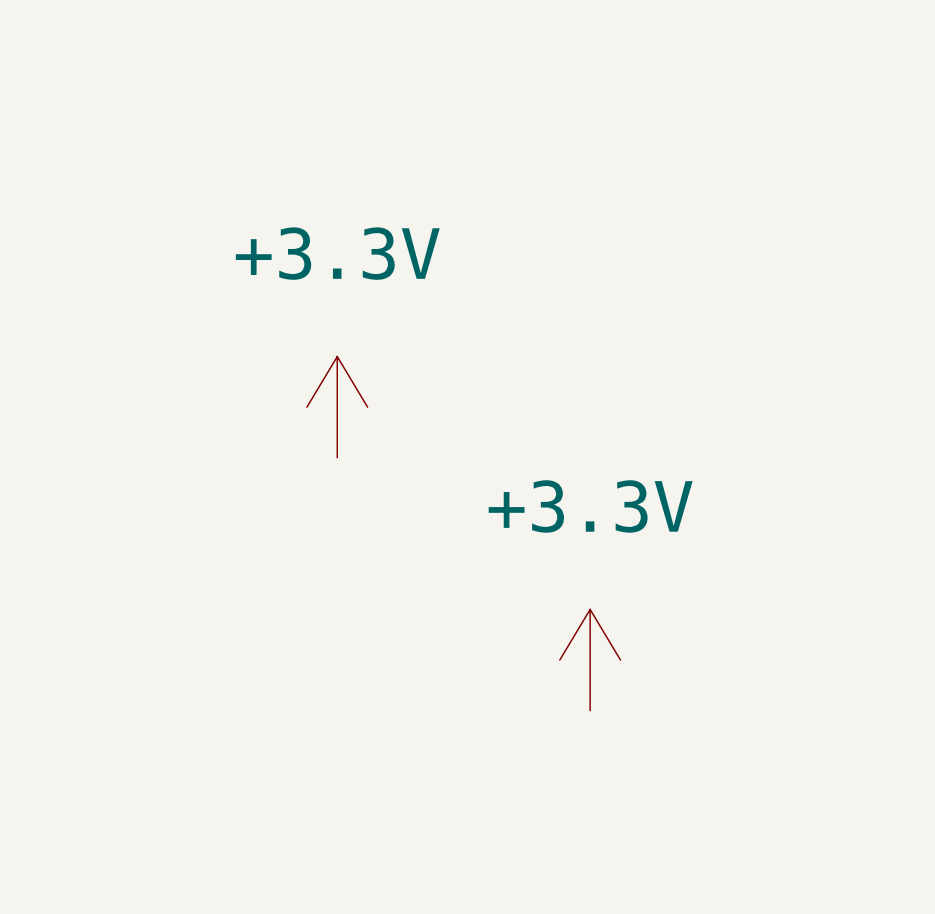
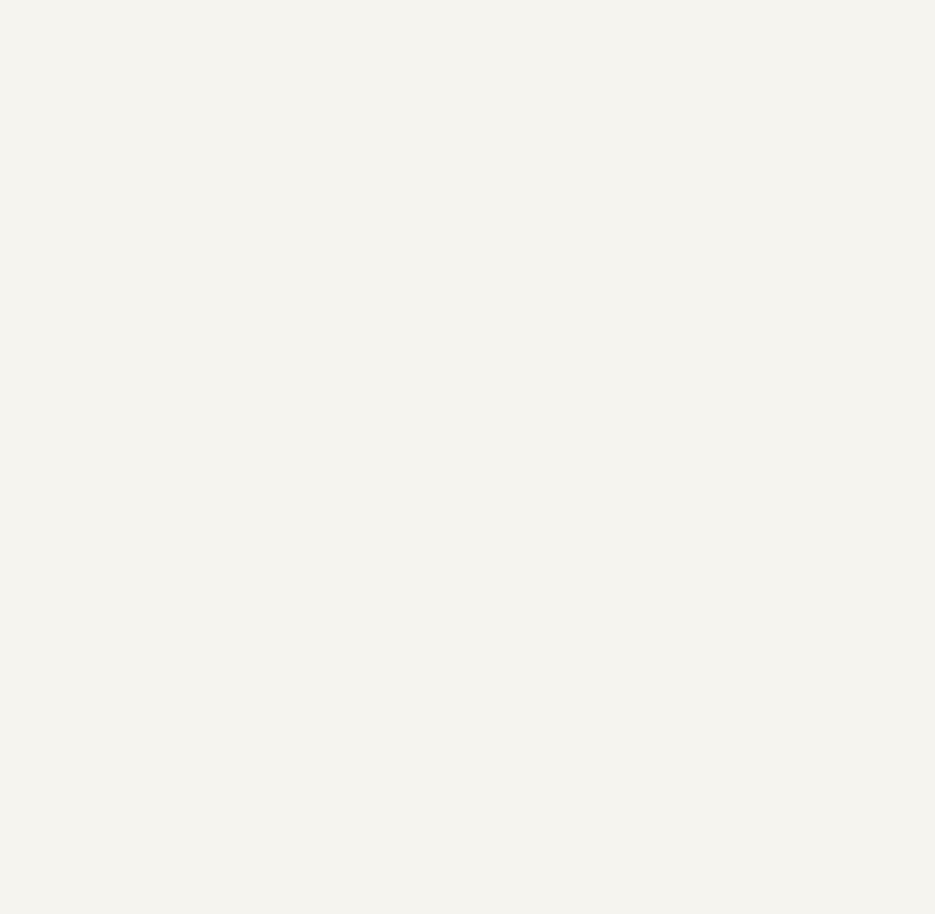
power symbol: +3.3V (337, 407) -> none
power symbol: +3.3V (590, 660) -> none

